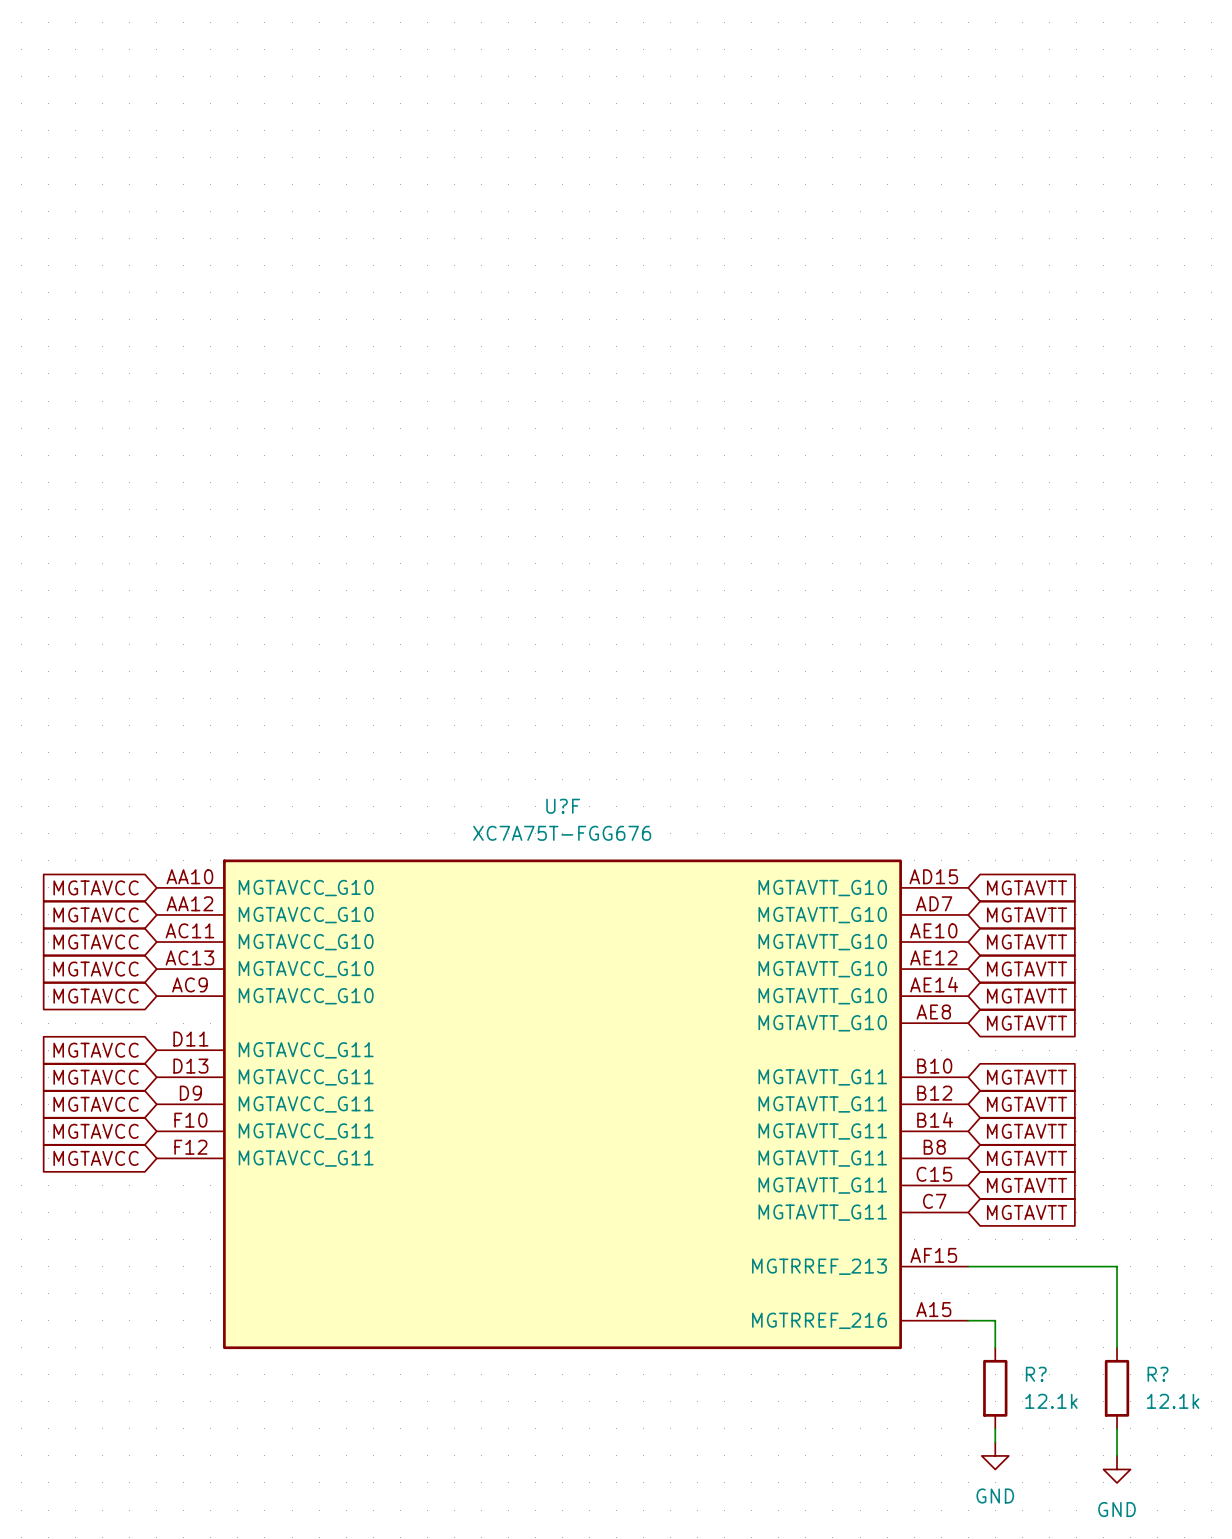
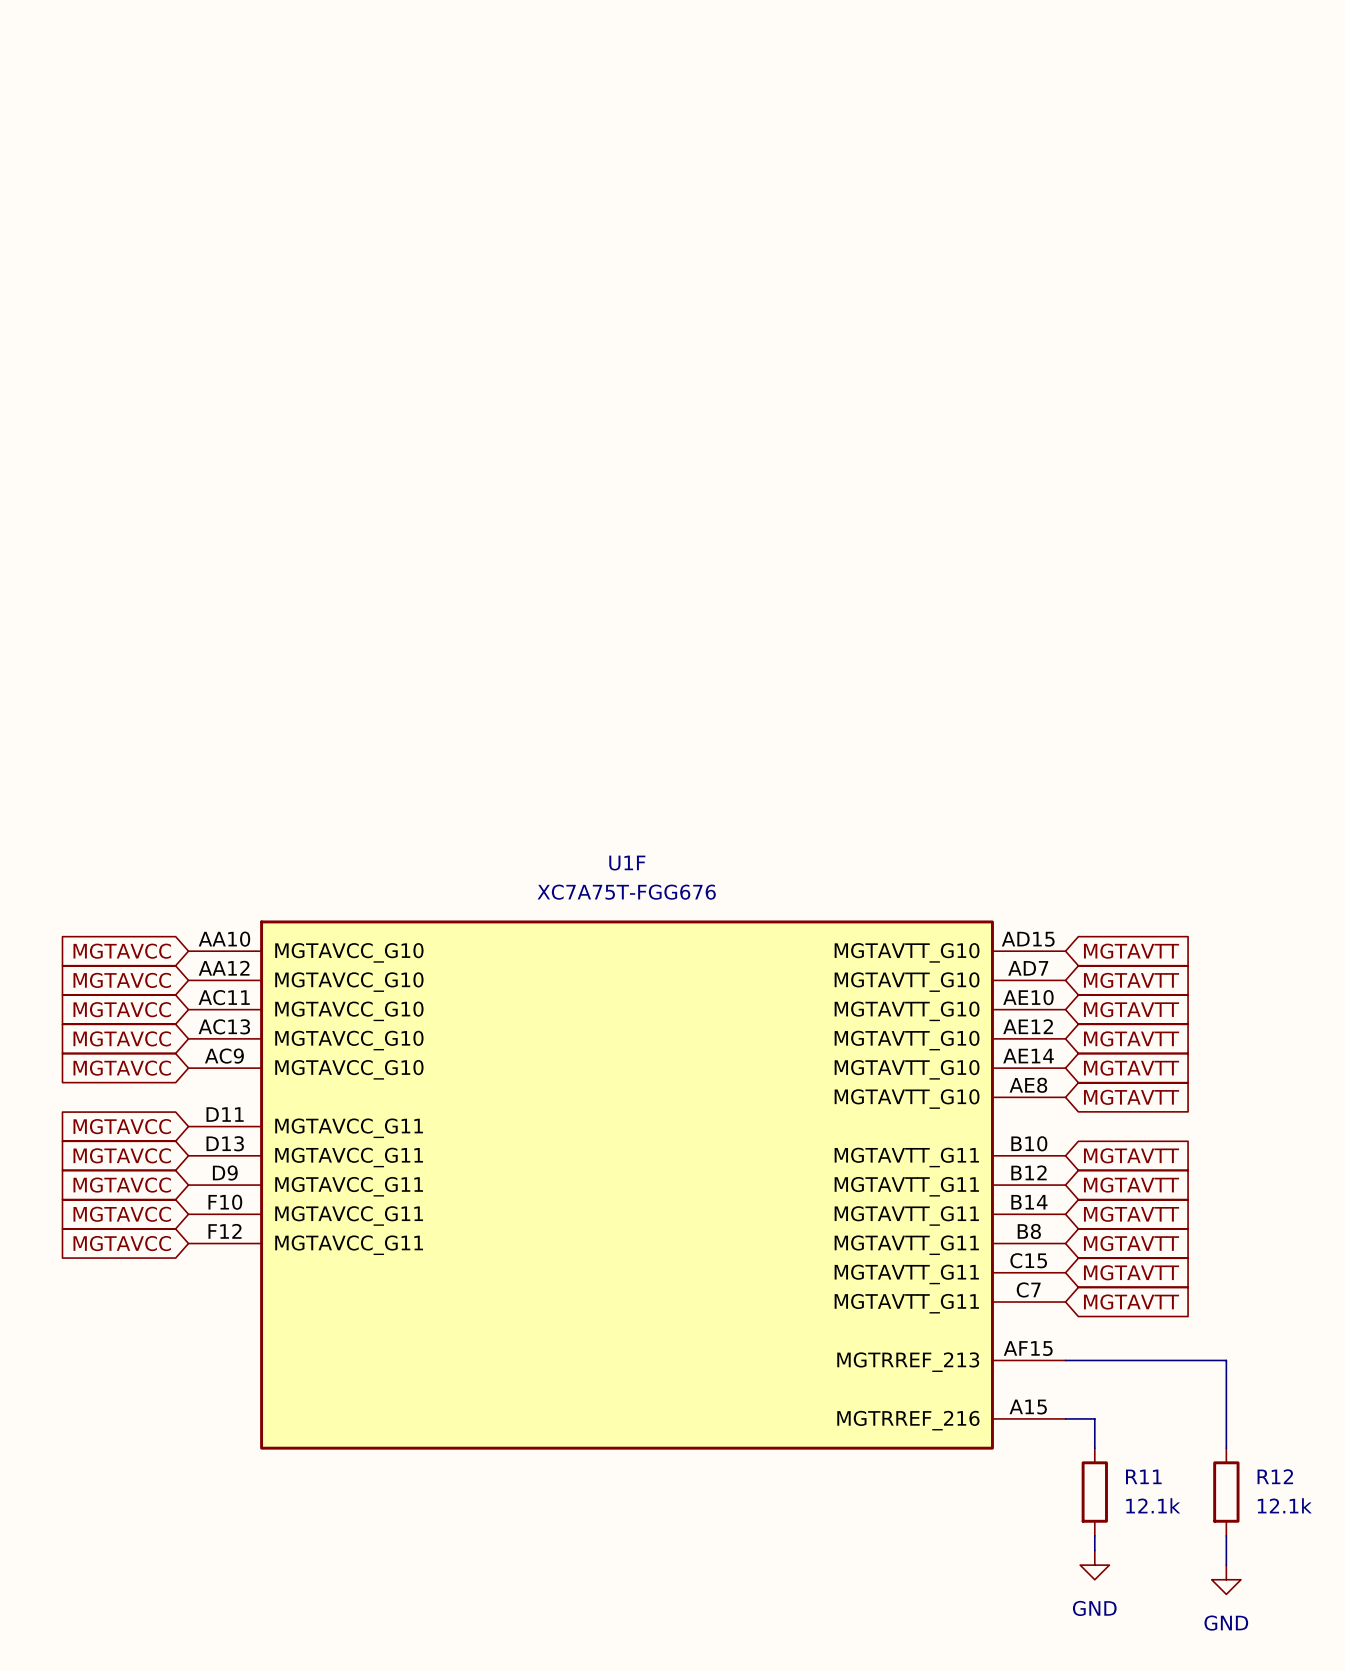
U?F name: U?F (563, 806) -> U1F (627, 863)
R? name: R? (1036, 1374) -> R11 (1143, 1476)
R? name: R? (1158, 1374) -> R12 (1275, 1476)

